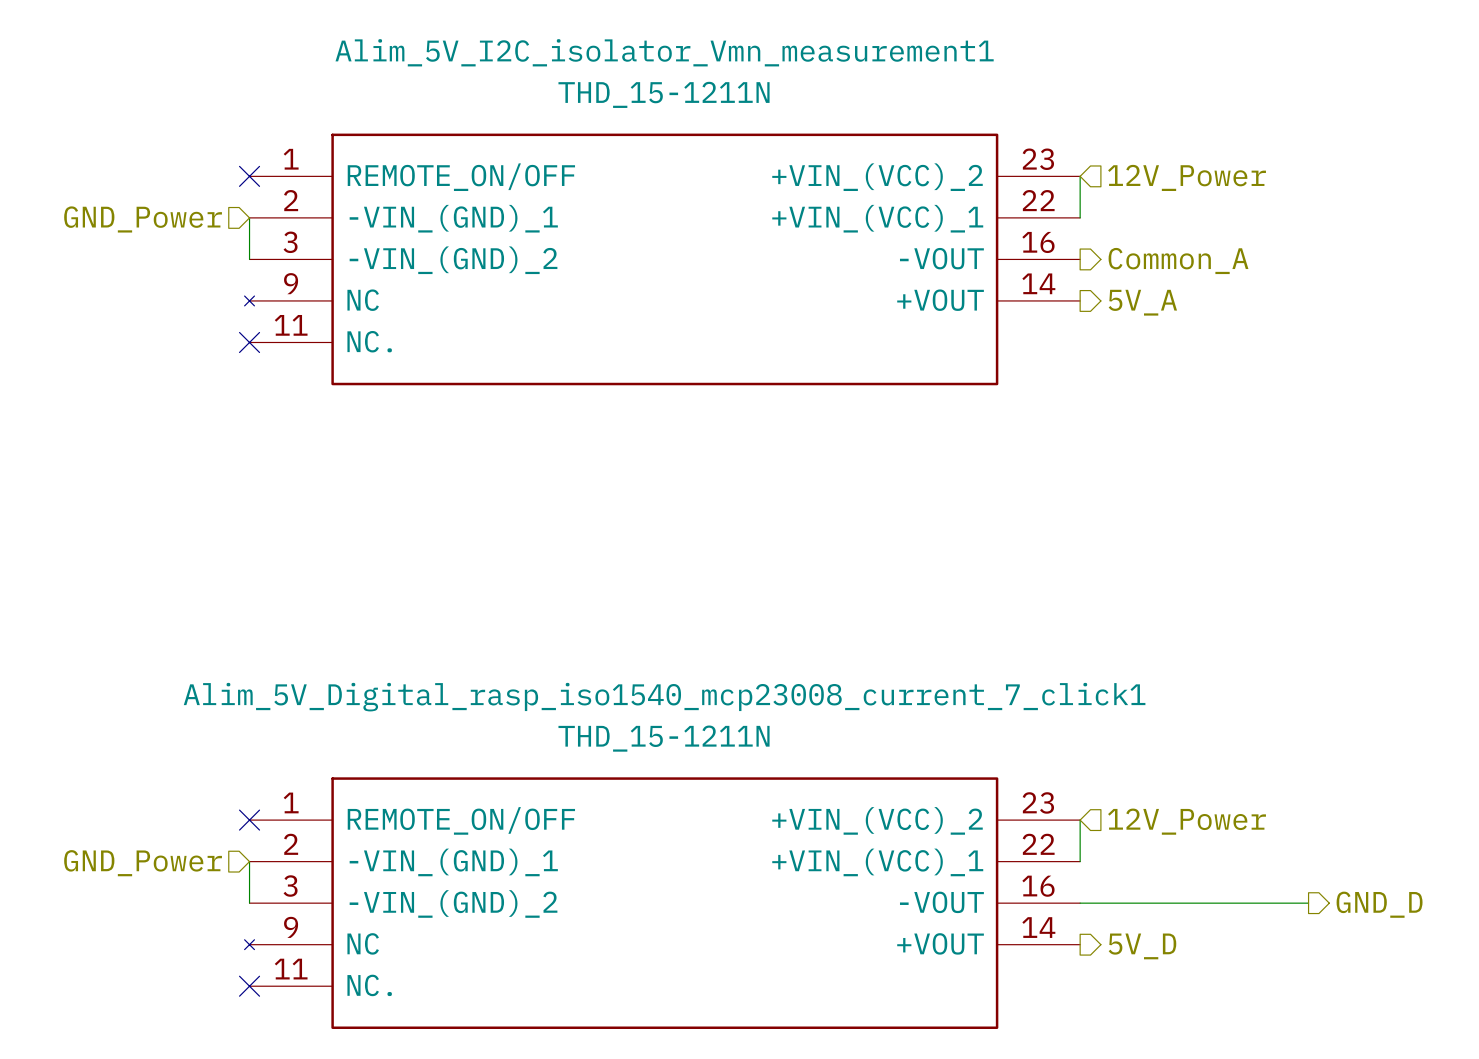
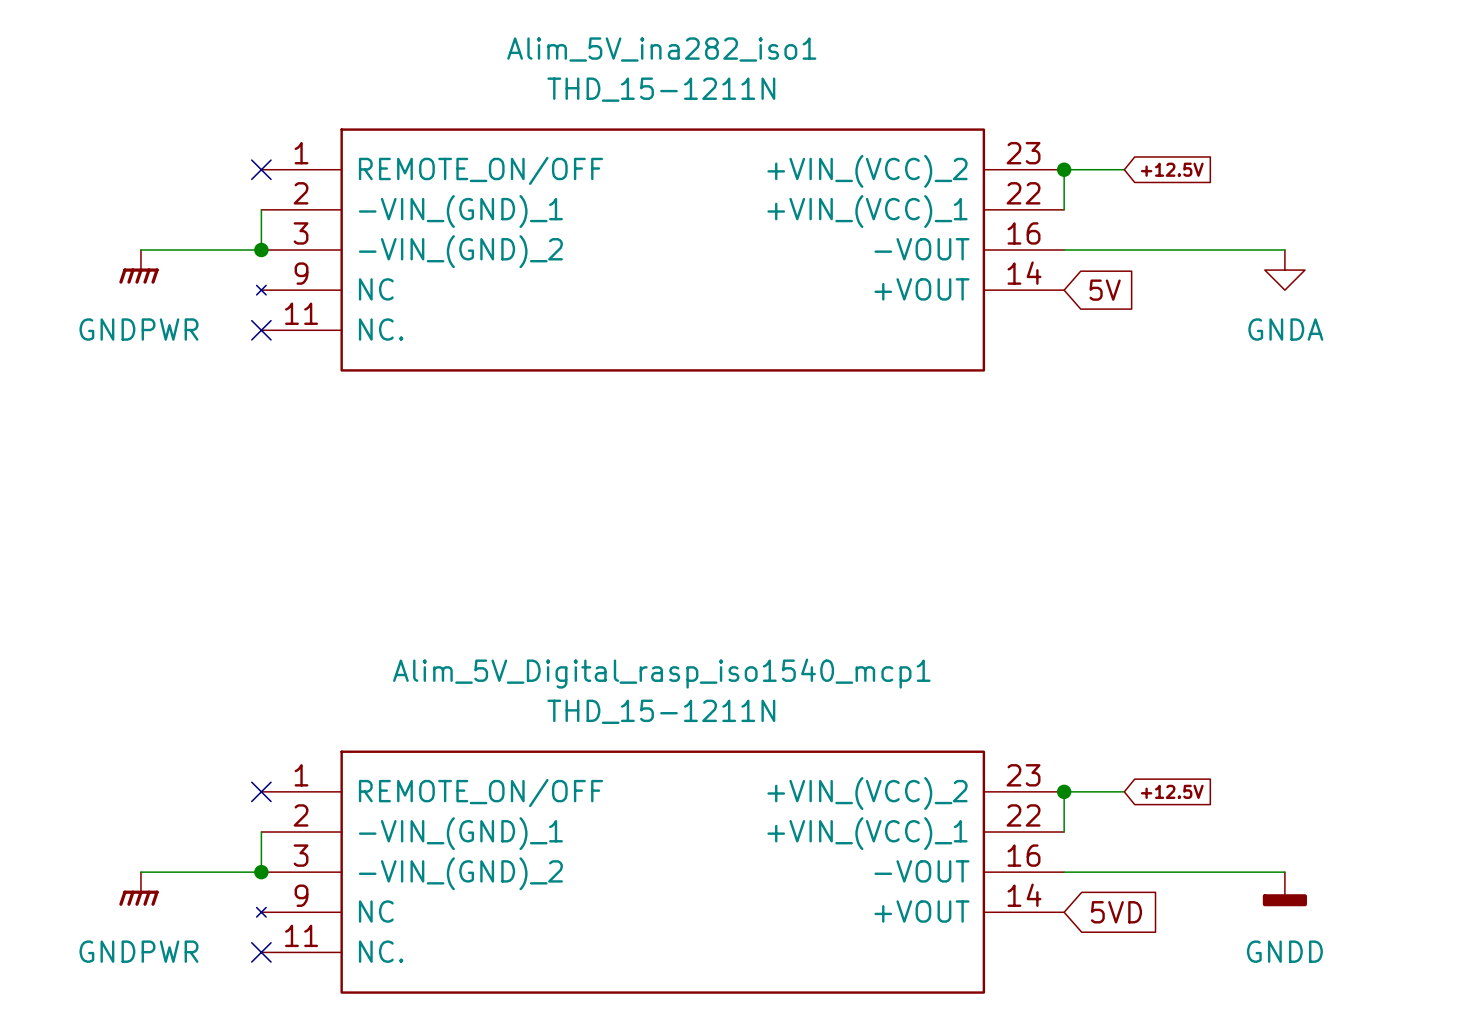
Alim_5V_I2C_isolator_Vmn_measurement1 name: Alim_5V_I2C_isolator_Vmn_measurement1 (664, 52) -> Alim_5V_ina282_iso1 (661, 49)
wire: none -> (1064, 169) (1124, 169)
junction: none -> (1064, 169)
global label: none -> +12.5V (1172, 169)
hierarchical label: 12V_Power (1187, 177) -> none
hierarchical label: GND_Power (143, 219) -> none
wire: none -> (140, 250) (261, 250)
junction: none -> (261, 250)
wire: none -> (1064, 250) (1284, 250)
hierarchical label: Common_A (1178, 260) -> none
power symbol: none -> GNDPWR (138, 266)
power symbol: none -> GNDA (1284, 270)
global label: none -> 5V (1105, 290)
hierarchical label: 5V_A (1142, 302) -> none
Alim_5V_Digital_rasp_iso1540_mcp23008_current_7_click1 name: Alim_5V_Digital_rasp_iso1540_mcp23008_current_7_click1 (664, 697) -> Alim_5V_Digital_rasp_iso1540_mcp1 (661, 673)
wire: none -> (1064, 791) (1124, 791)
junction: none -> (1064, 791)
global label: none -> +12.5V (1172, 791)
hierarchical label: 12V_Power (1187, 821) -> none
hierarchical label: GND_Power (143, 863) -> none
wire: none -> (140, 872) (261, 872)
junction: none -> (261, 872)
hierarchical label: GND_D (1379, 904) -> none
power symbol: none -> GNDPWR (138, 889)
power symbol: none -> GNDD (1284, 889)
global label: none -> 5VD (1116, 912)
hierarchical label: 5V_D (1142, 946) -> none

